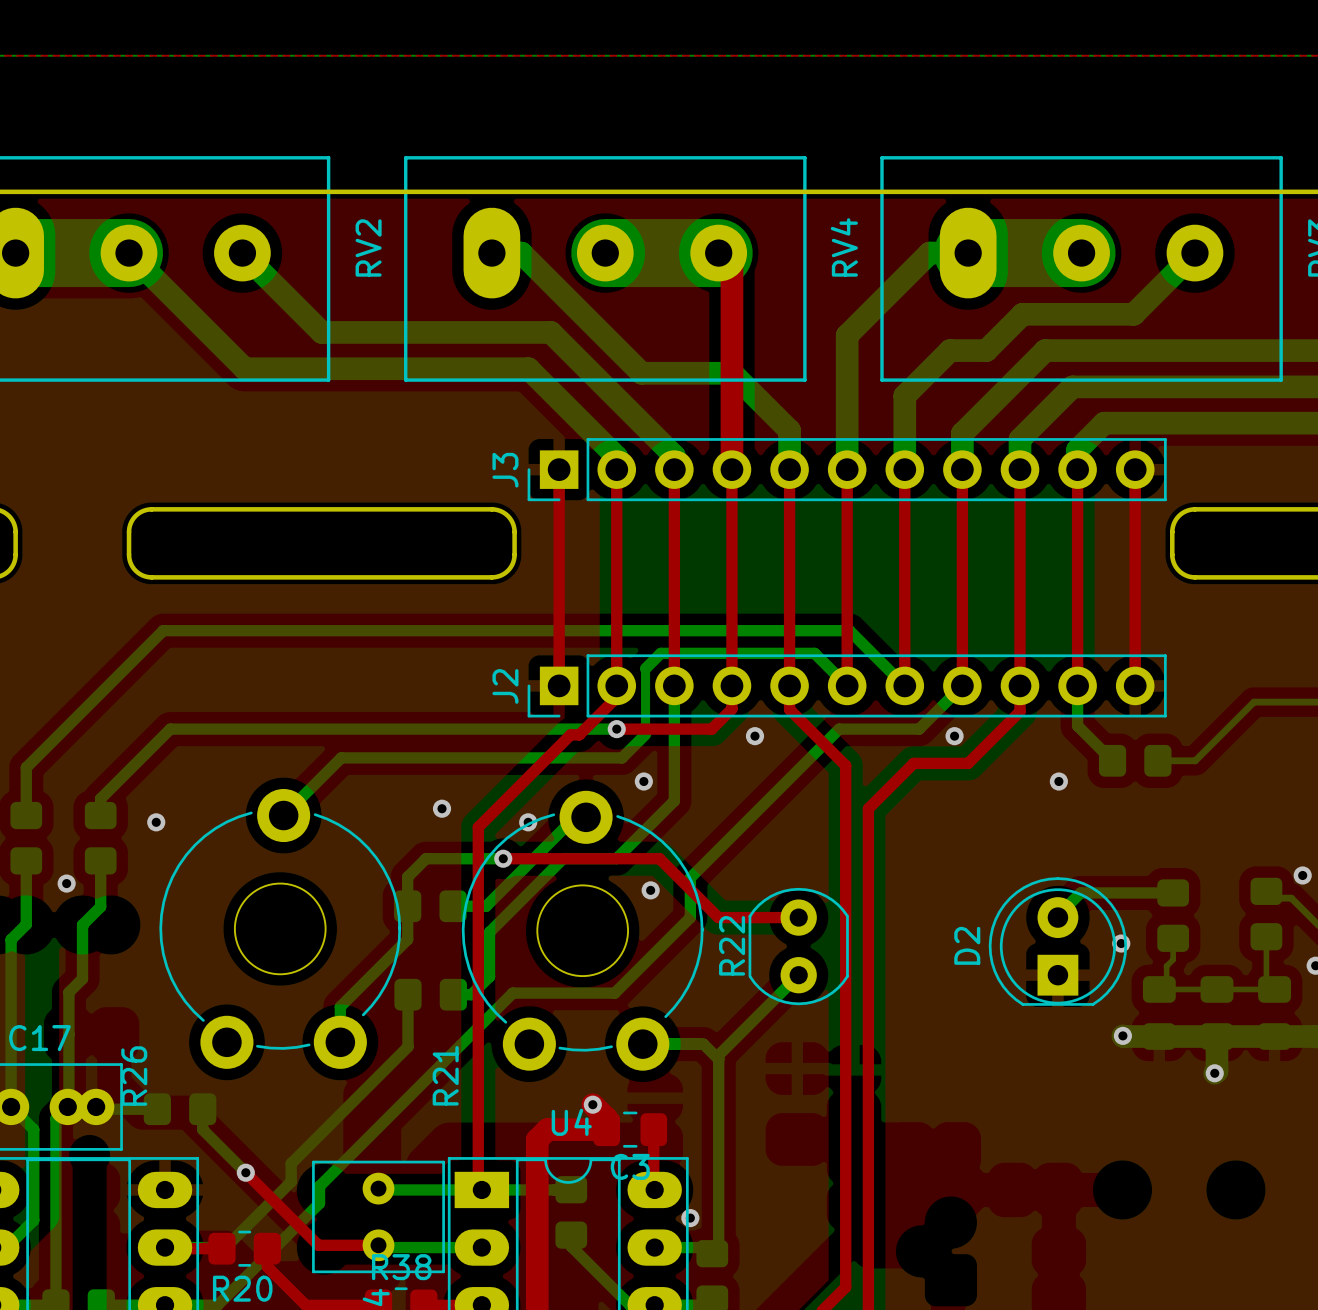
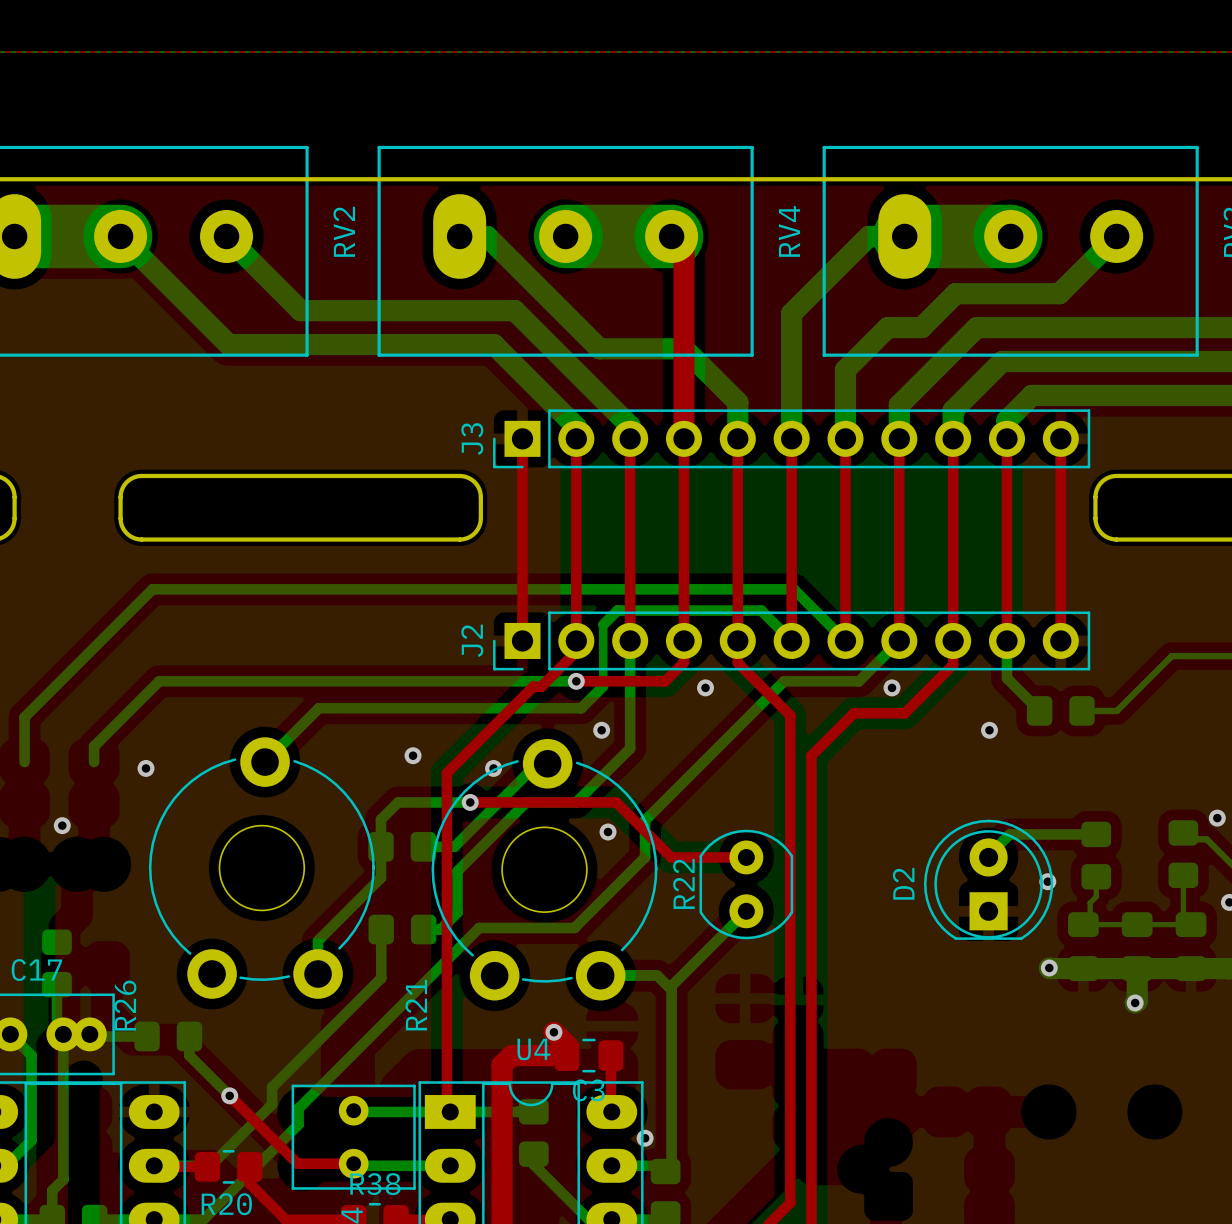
part: (26, 838) -> none
part: (100, 838) -> none
bottom track: (26, 860) (26, 924) (11, 939) (11, 1106) -> none
bottom track: (100, 860) (100, 906) (83, 924) -> none
bottom track: (82, 924) (82, 978) (68, 992) (68, 1105) (55, 1118) (55, 1274) -> (56, 984) (56, 1028) (63, 1034) (63, 1179) (52, 1190)
part: none -> (56, 963)

